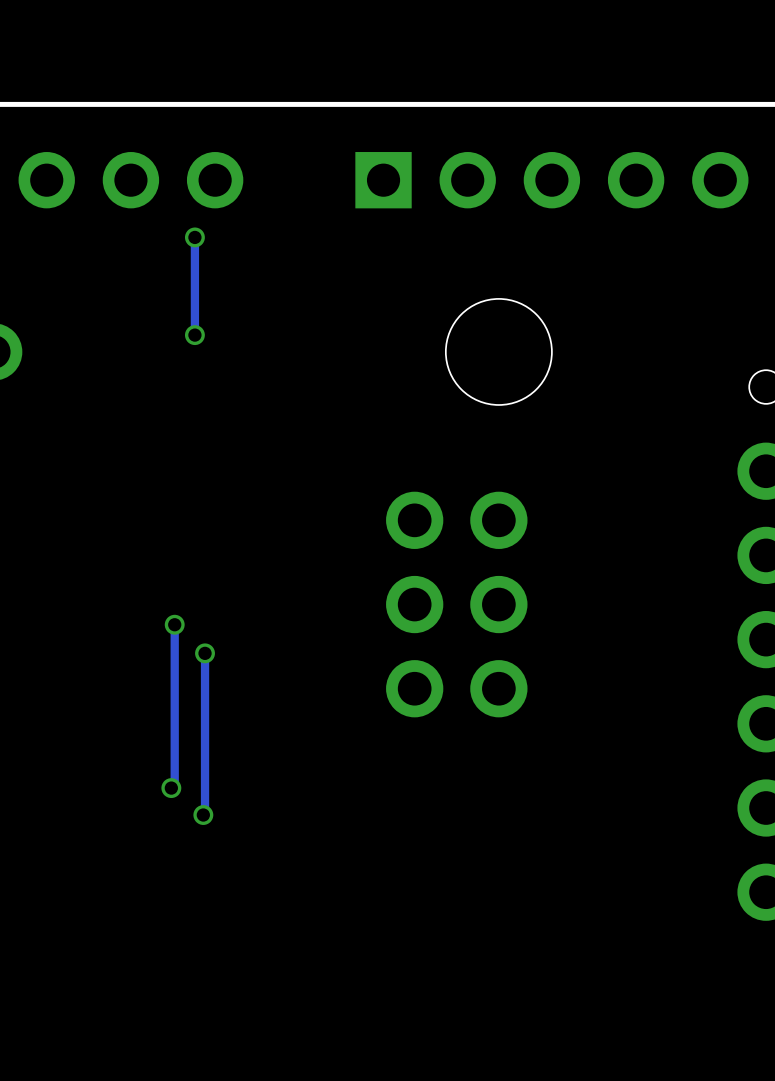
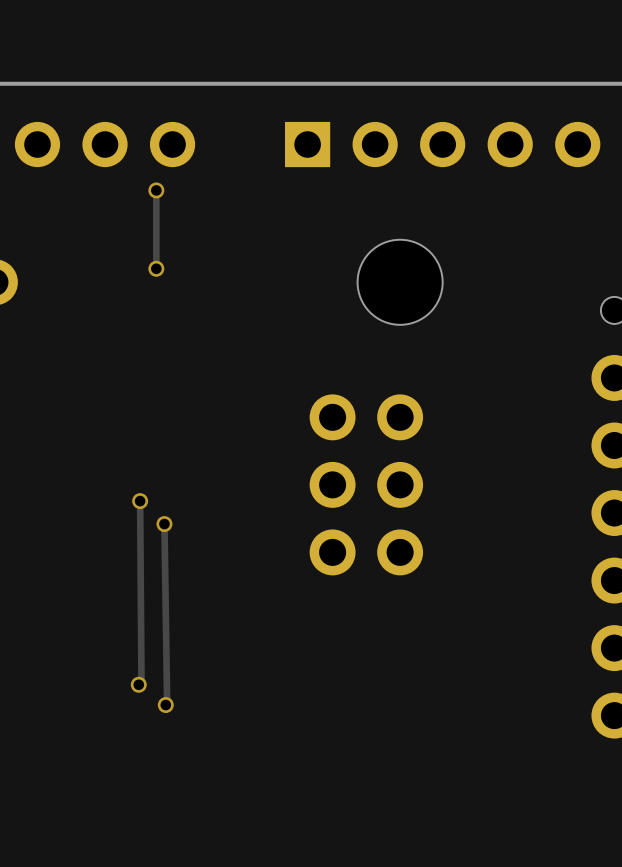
track: (174, 624) (174, 784) (171, 788) -> (140, 501) (141, 682) (138, 684)
track: (205, 653) (205, 813) (203, 815) -> (164, 524) (165, 705)
via: (171, 788) -> none
via: (203, 815) -> none
via: none -> (138, 684)
via: none -> (165, 705)

